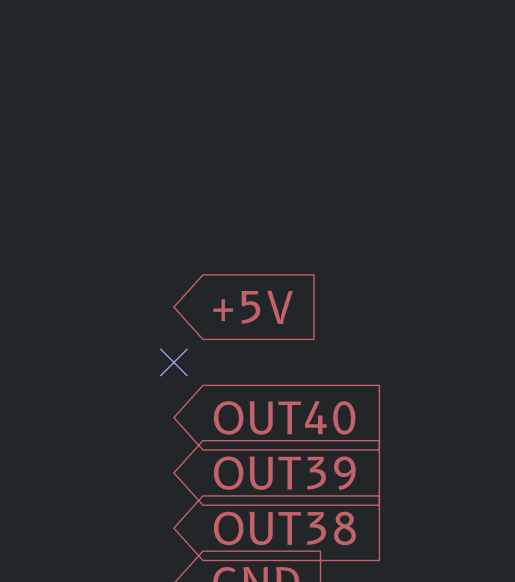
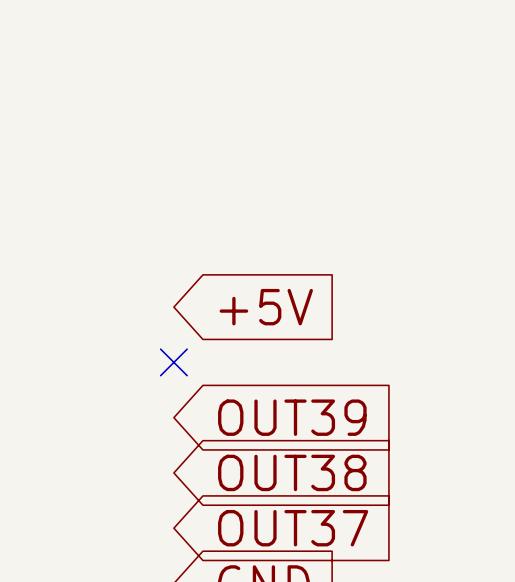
global label: OUT40 (284, 417) -> OUT39 (292, 417)
global label: OUT39 (284, 473) -> OUT38 (292, 472)
global label: OUT38 (284, 528) -> OUT37 (293, 528)

